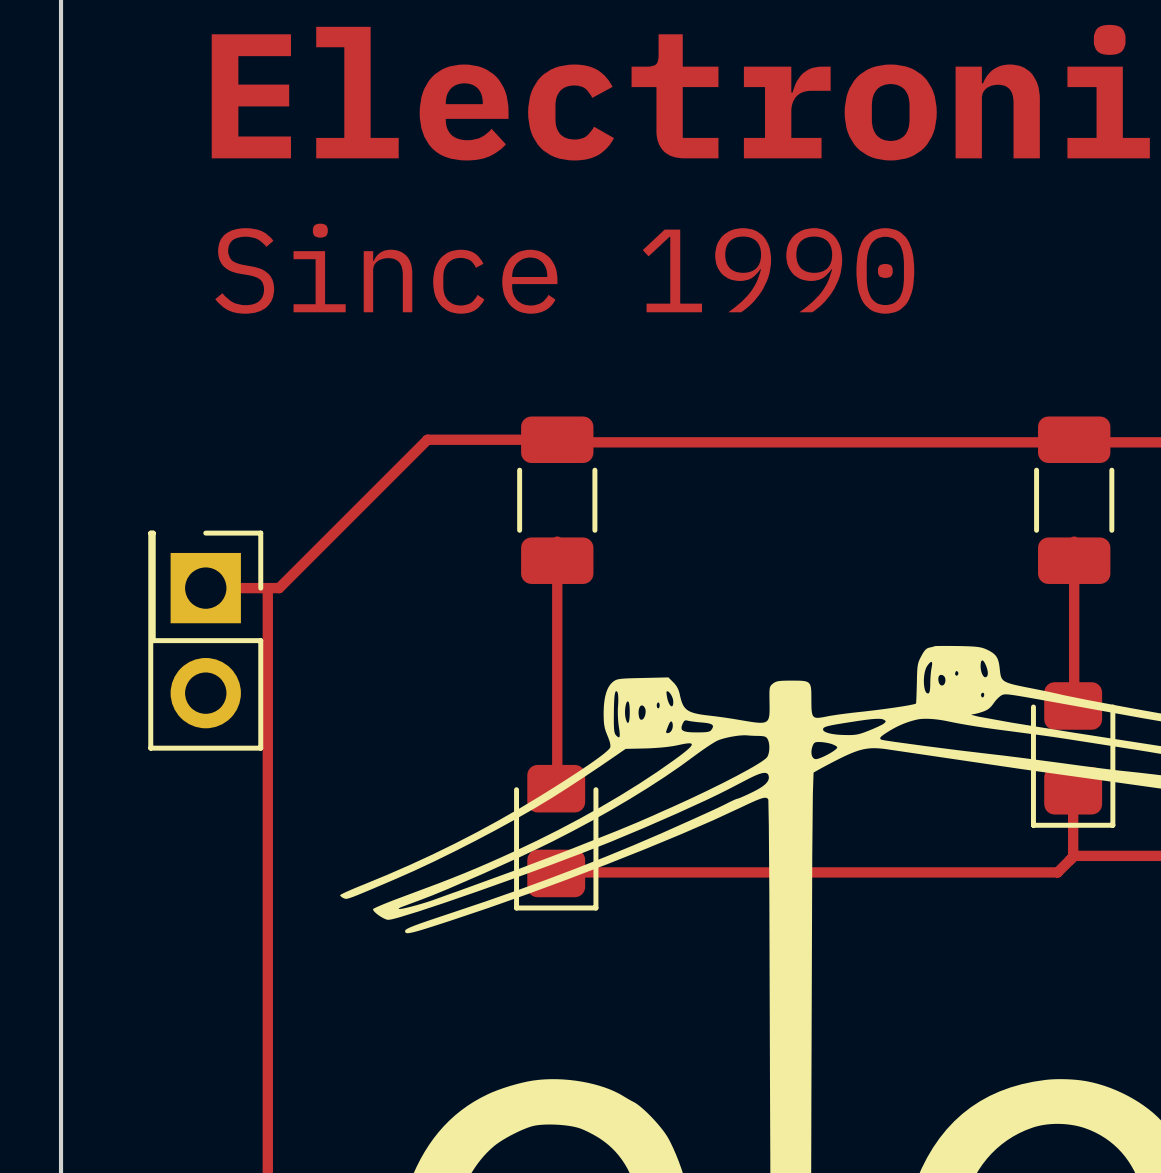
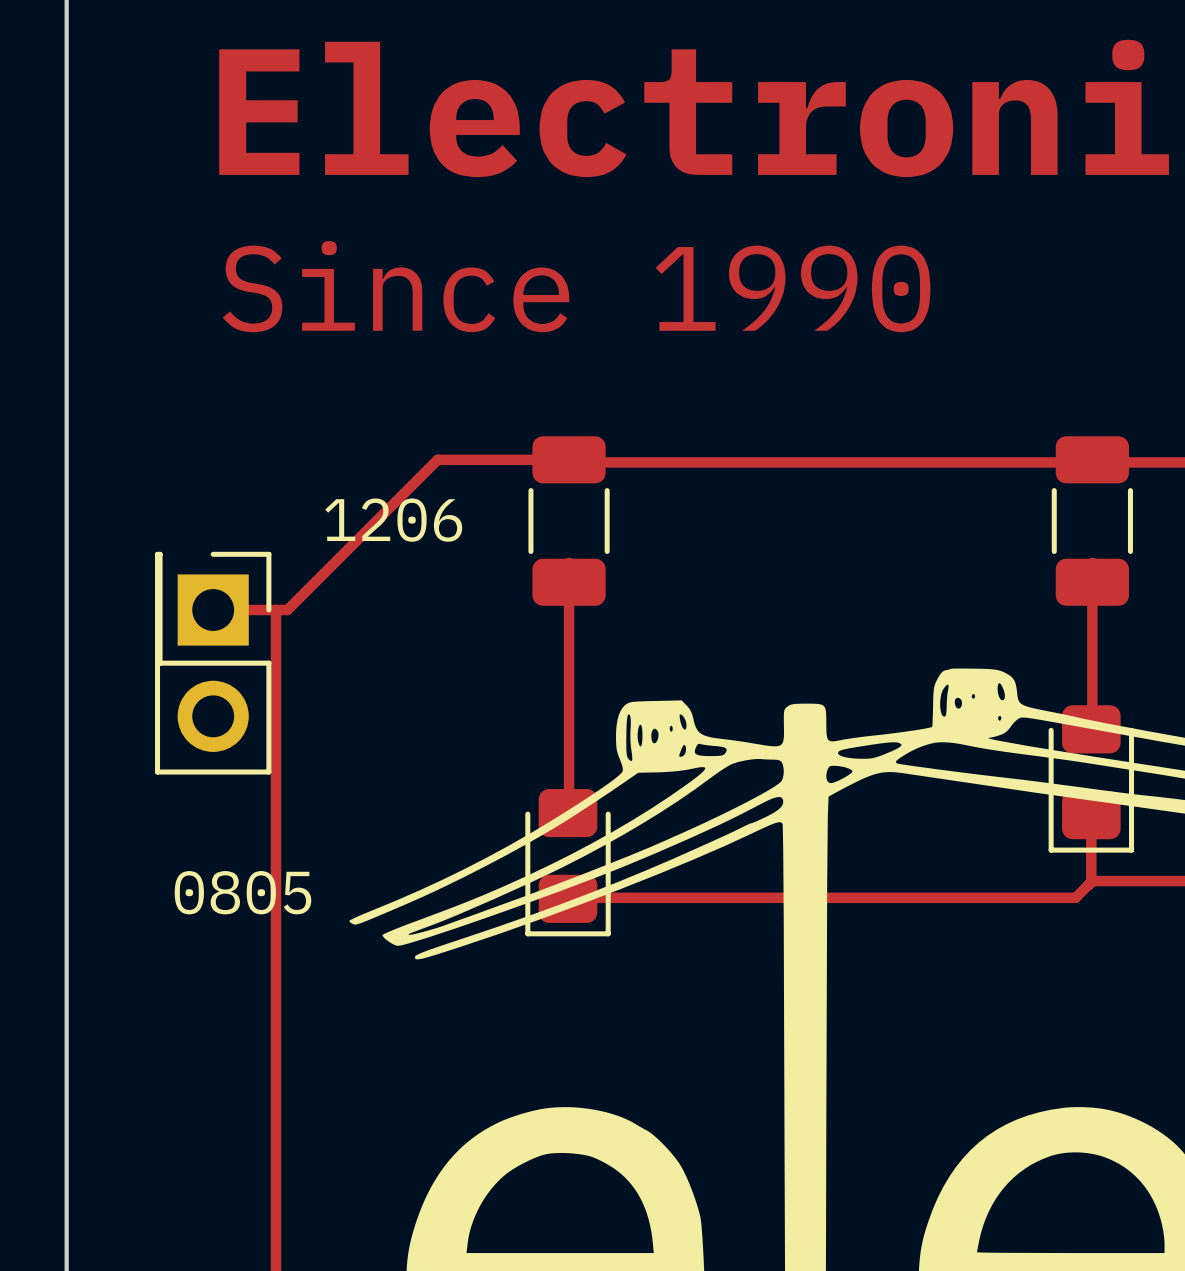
text: none -> 1206 (393, 520)
text: none -> 0805 (242, 892)

